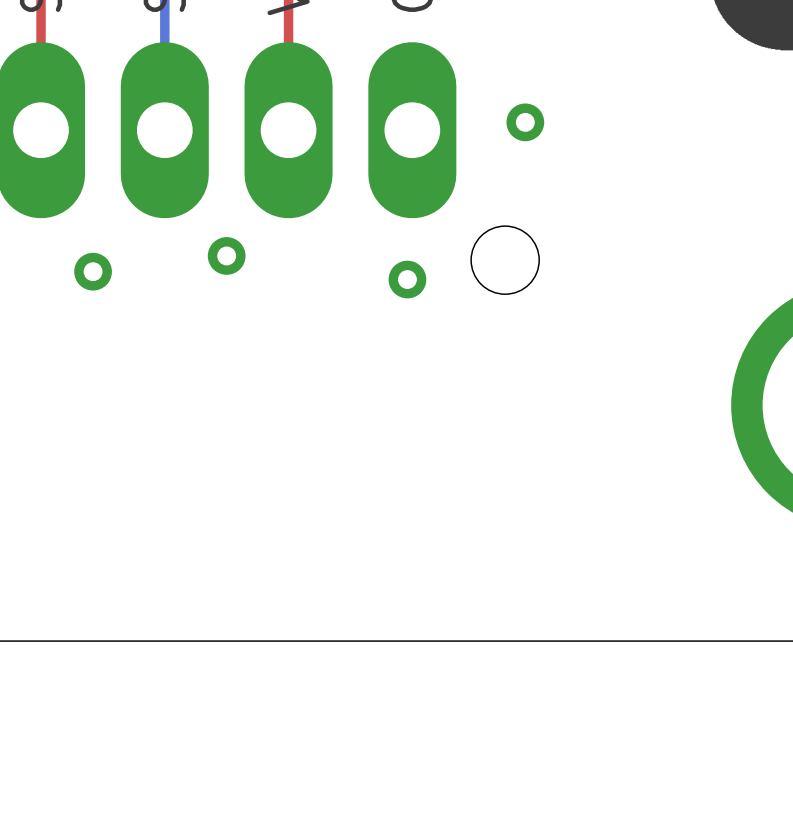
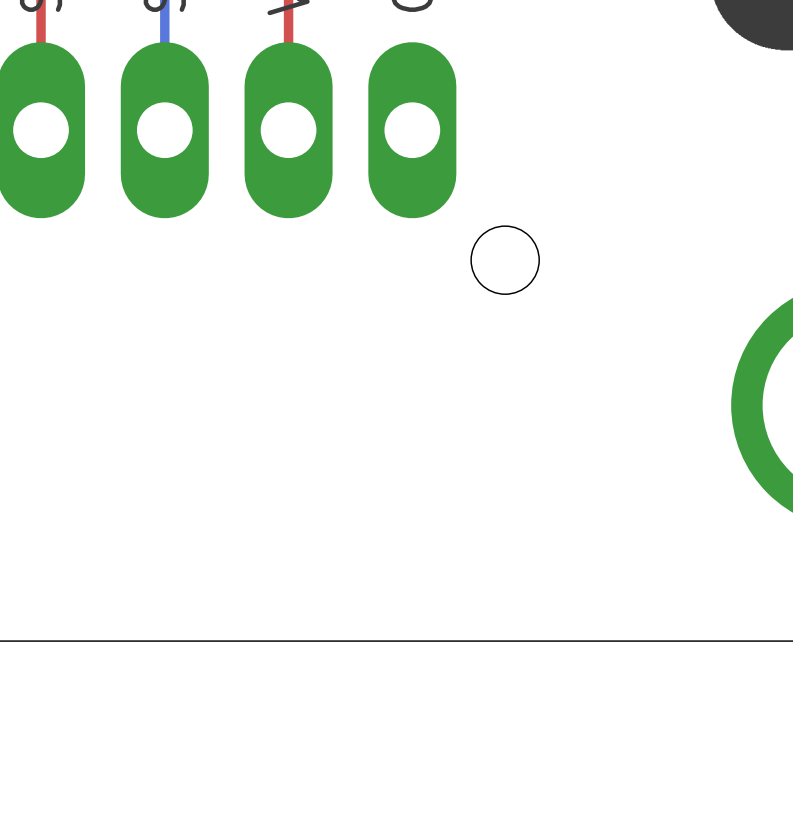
via: (525, 122) -> none
via: (226, 255) -> none
via: (93, 271) -> none
via: (407, 279) -> none

